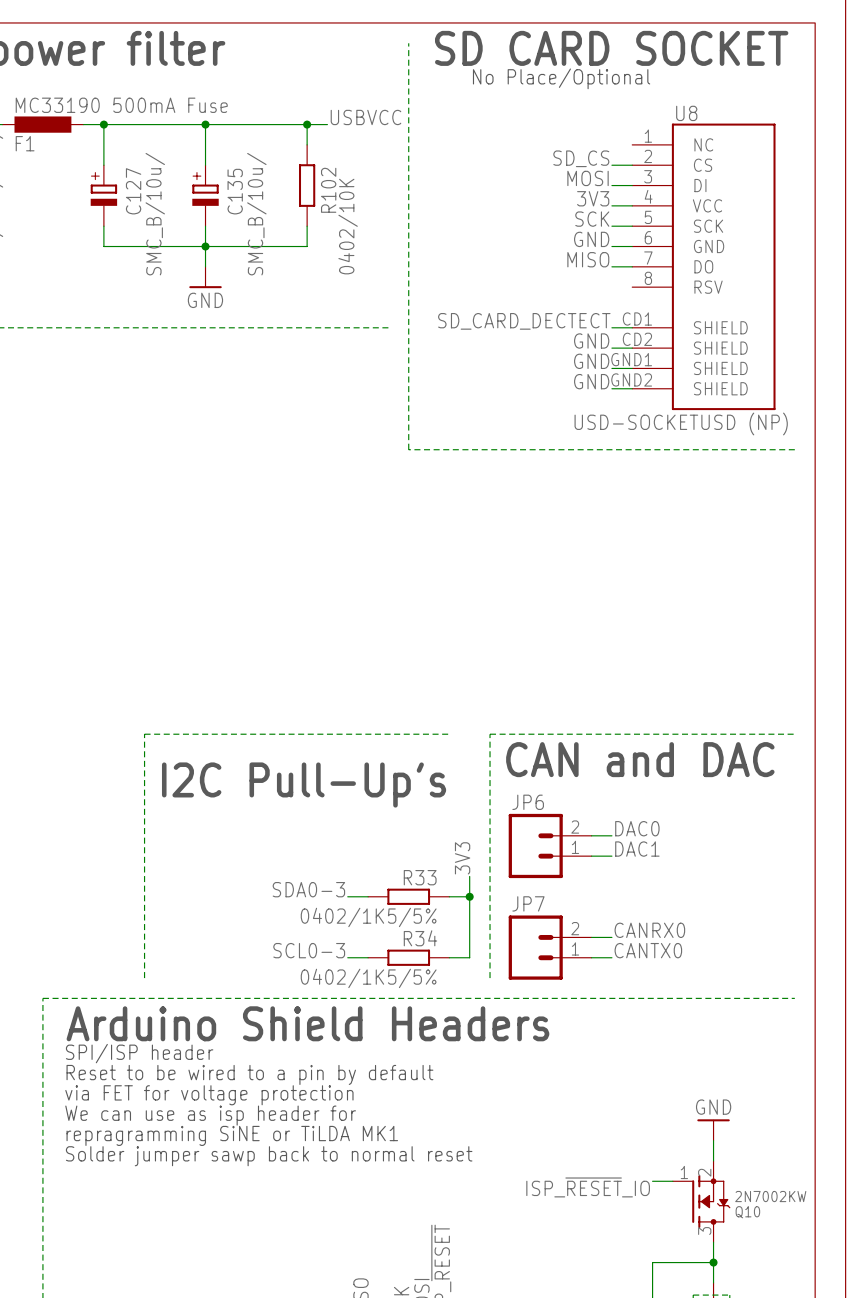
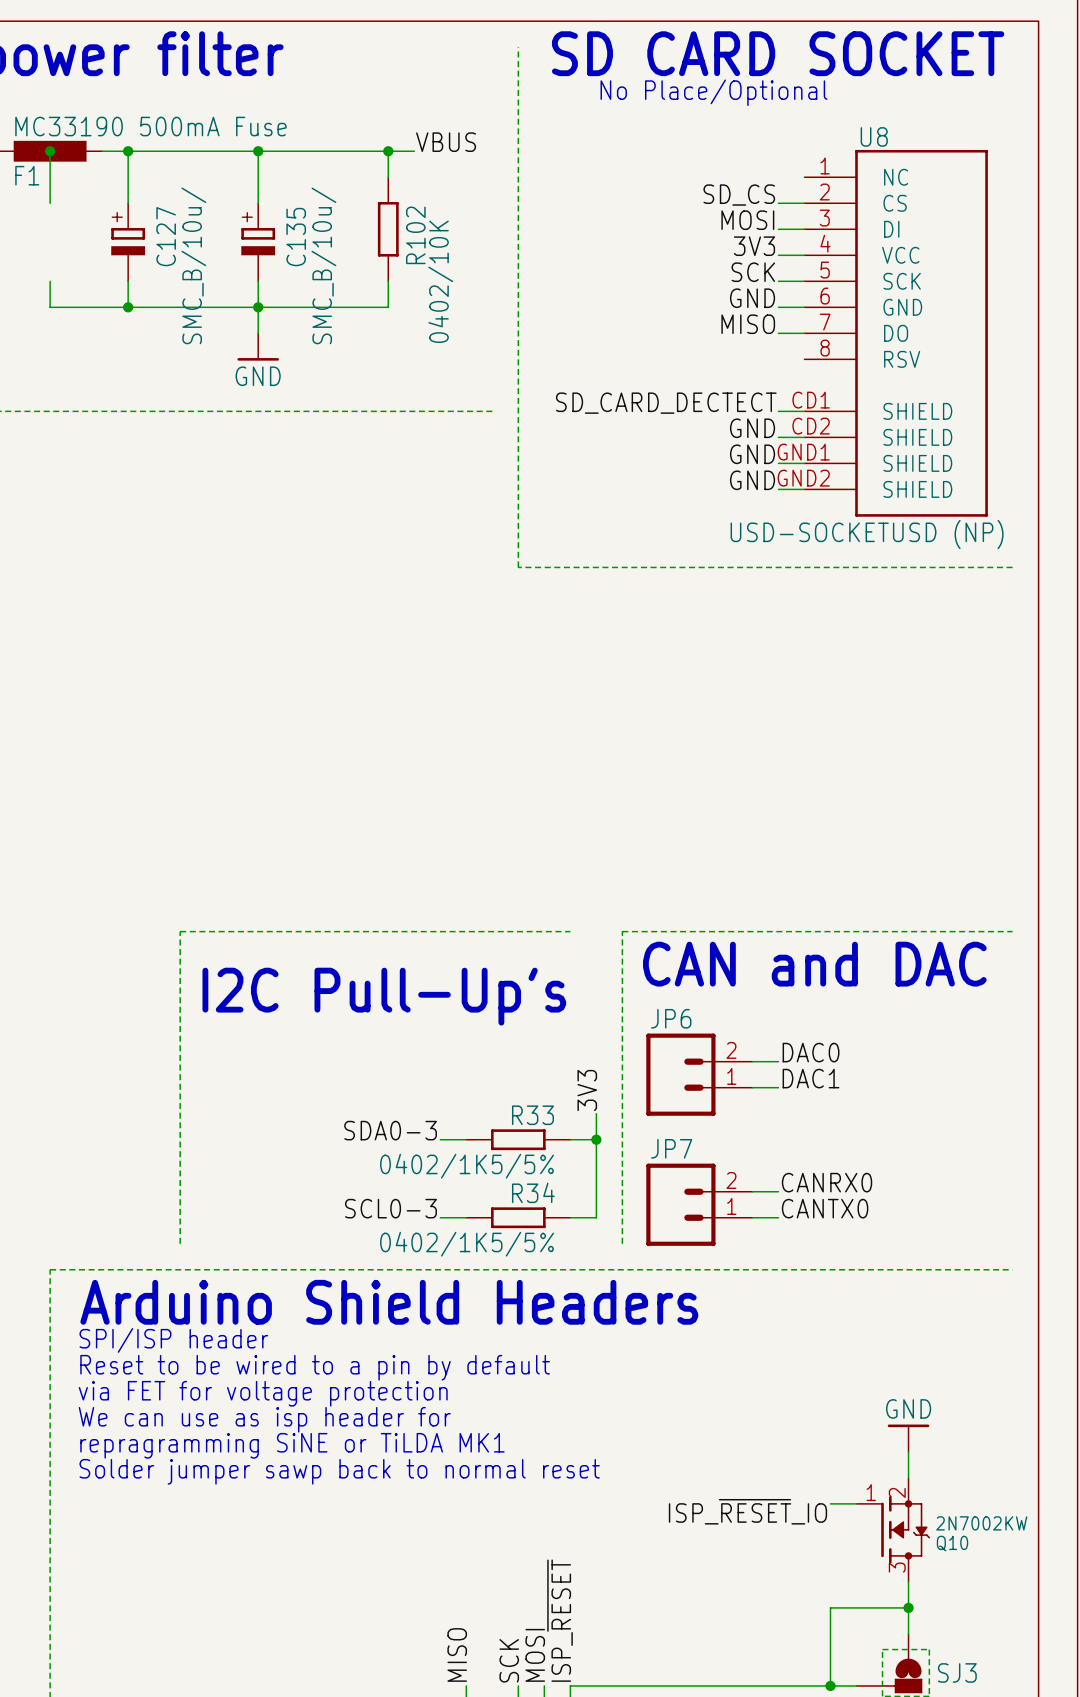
label: USBVCC (365, 117) -> VBUS (446, 142)
wire: none -> (50, 151) (50, 203)
junction: none -> (50, 151)
wire: none -> (50, 281) (50, 307) (128, 307)
junction: none -> (128, 307)

